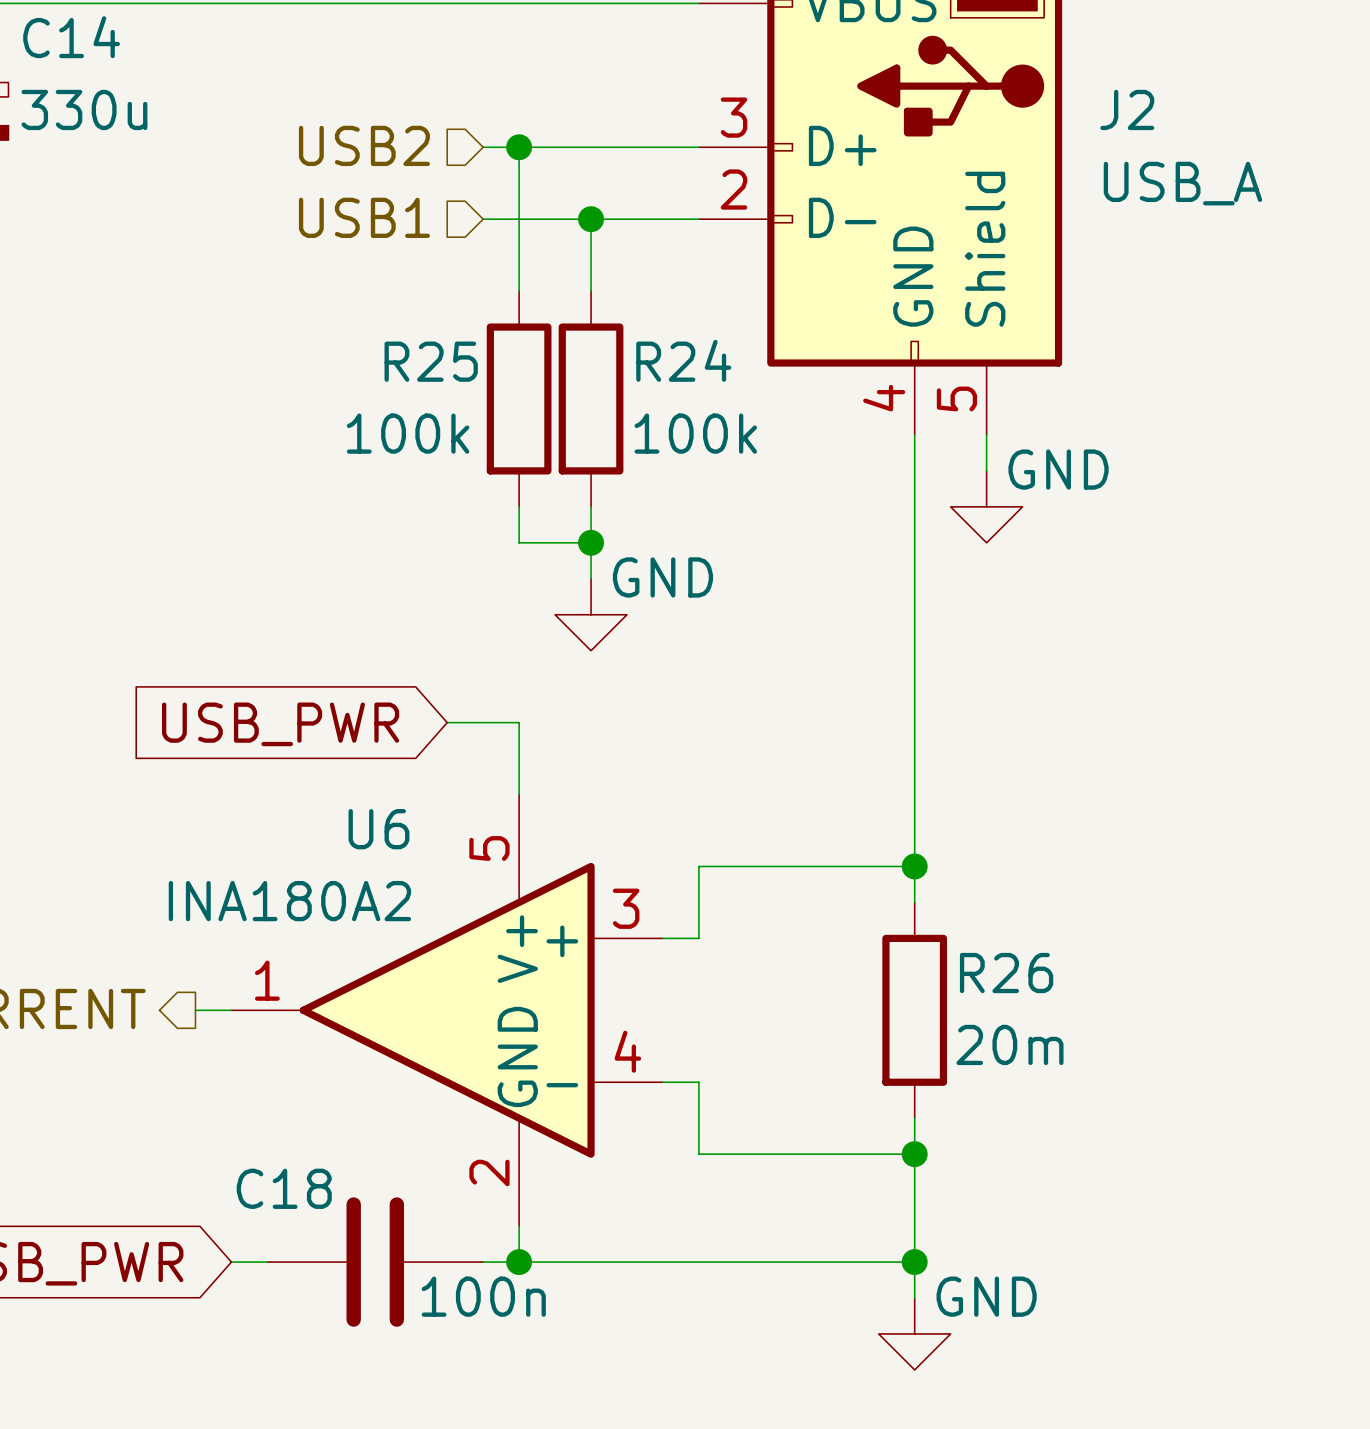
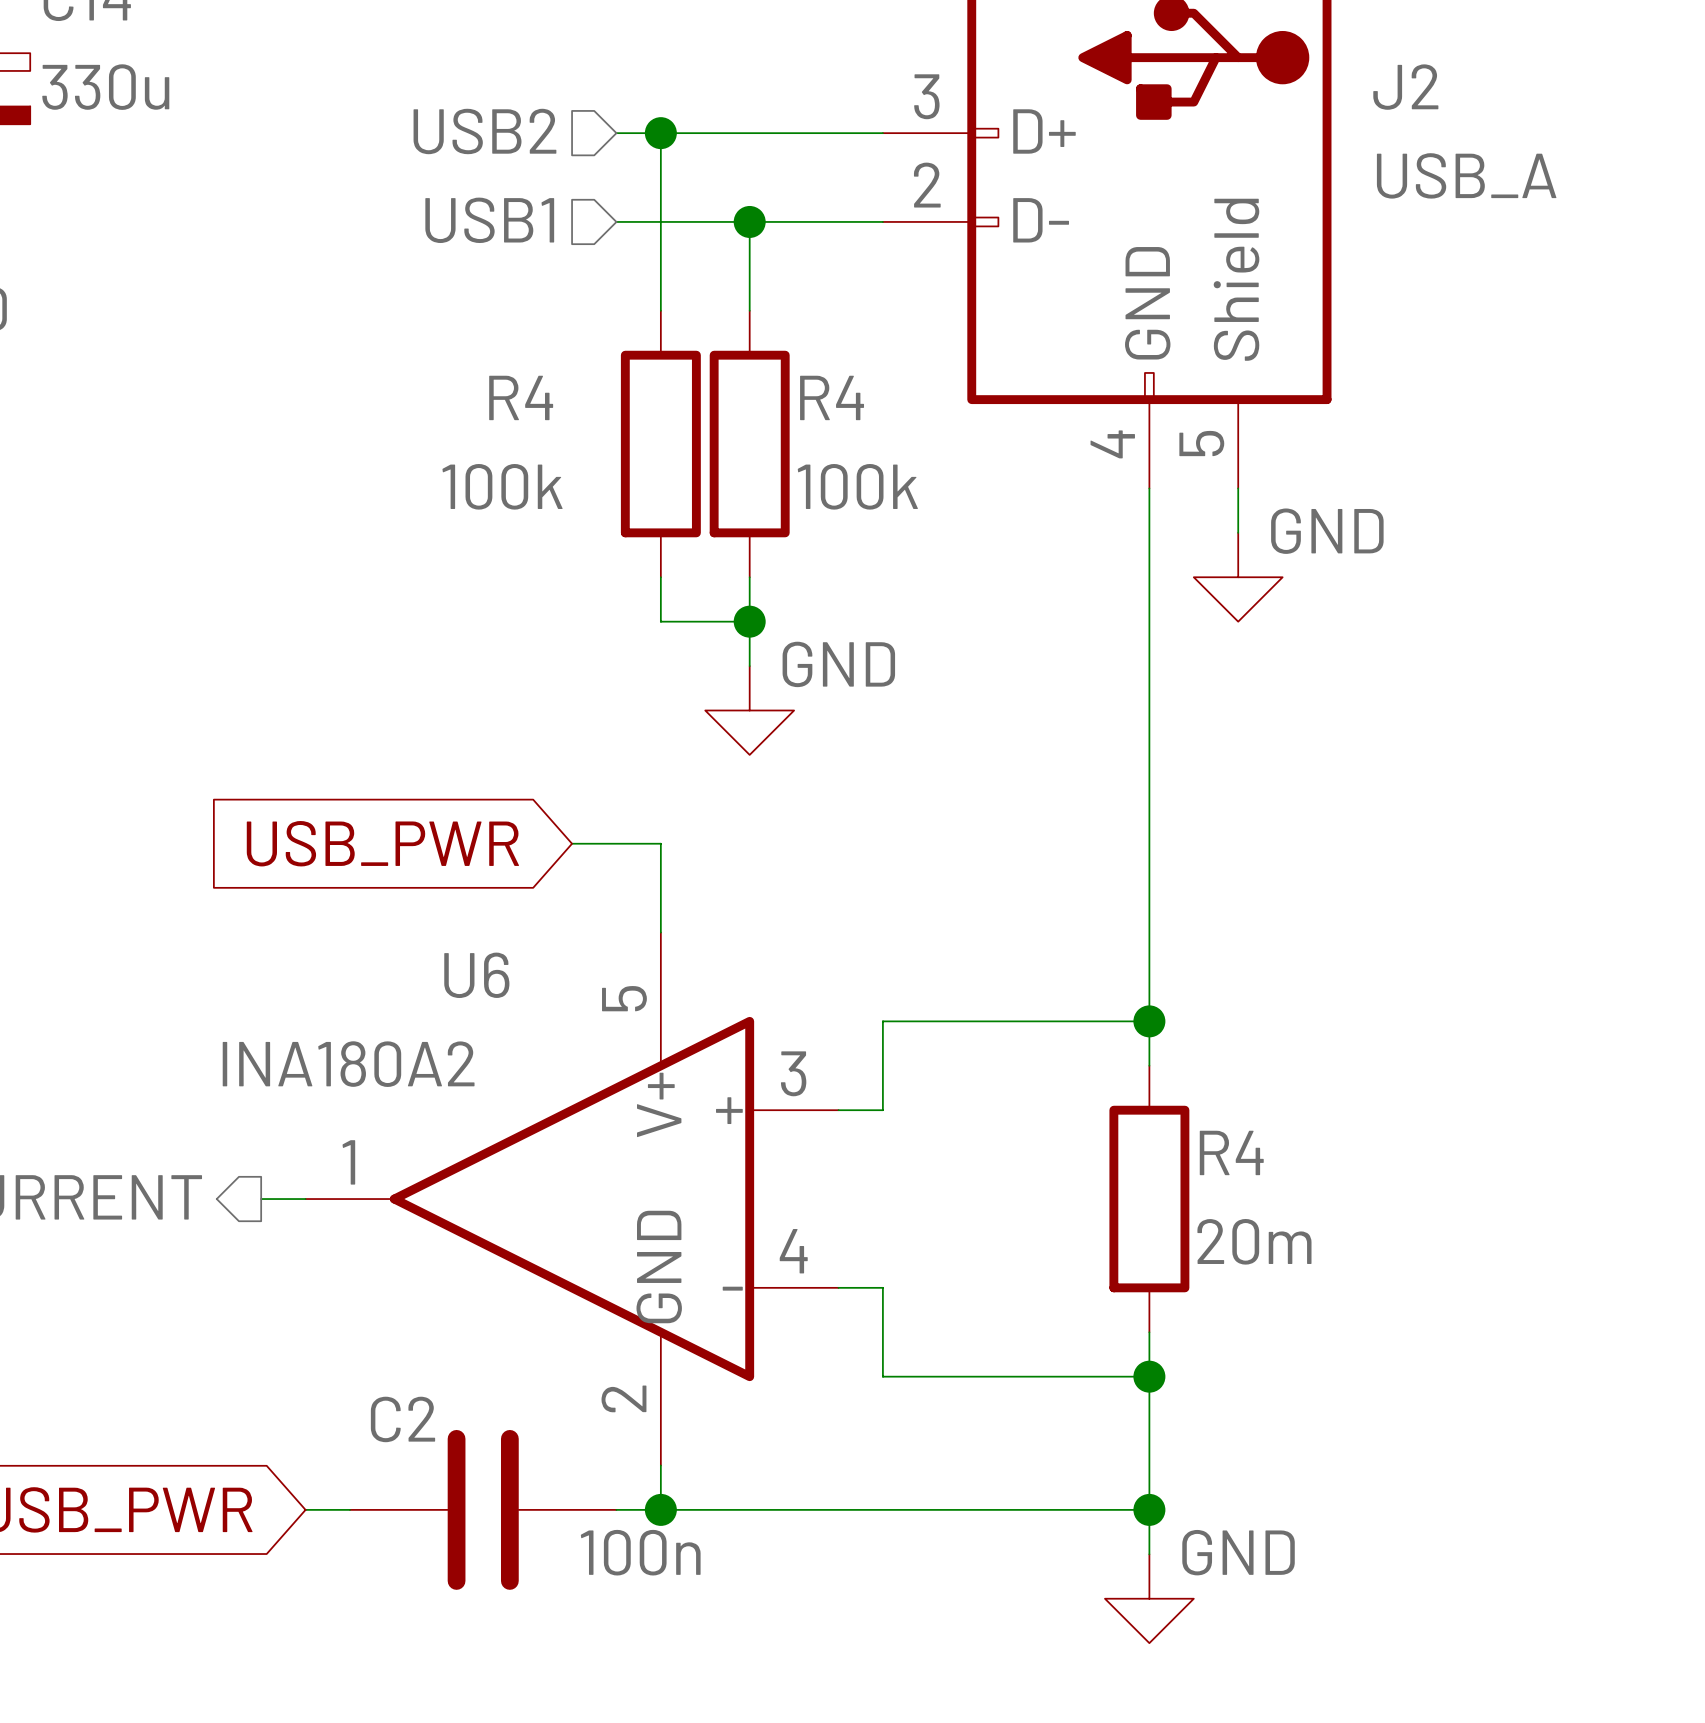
R24 name: R24 (683, 360) -> R4 (832, 397)
R25 name: R25 (431, 361) -> R4 (521, 397)
R26 name: R26 (1006, 973) -> R4 (1231, 1152)
C18 name: C18 (284, 1188) -> C2 (402, 1419)

